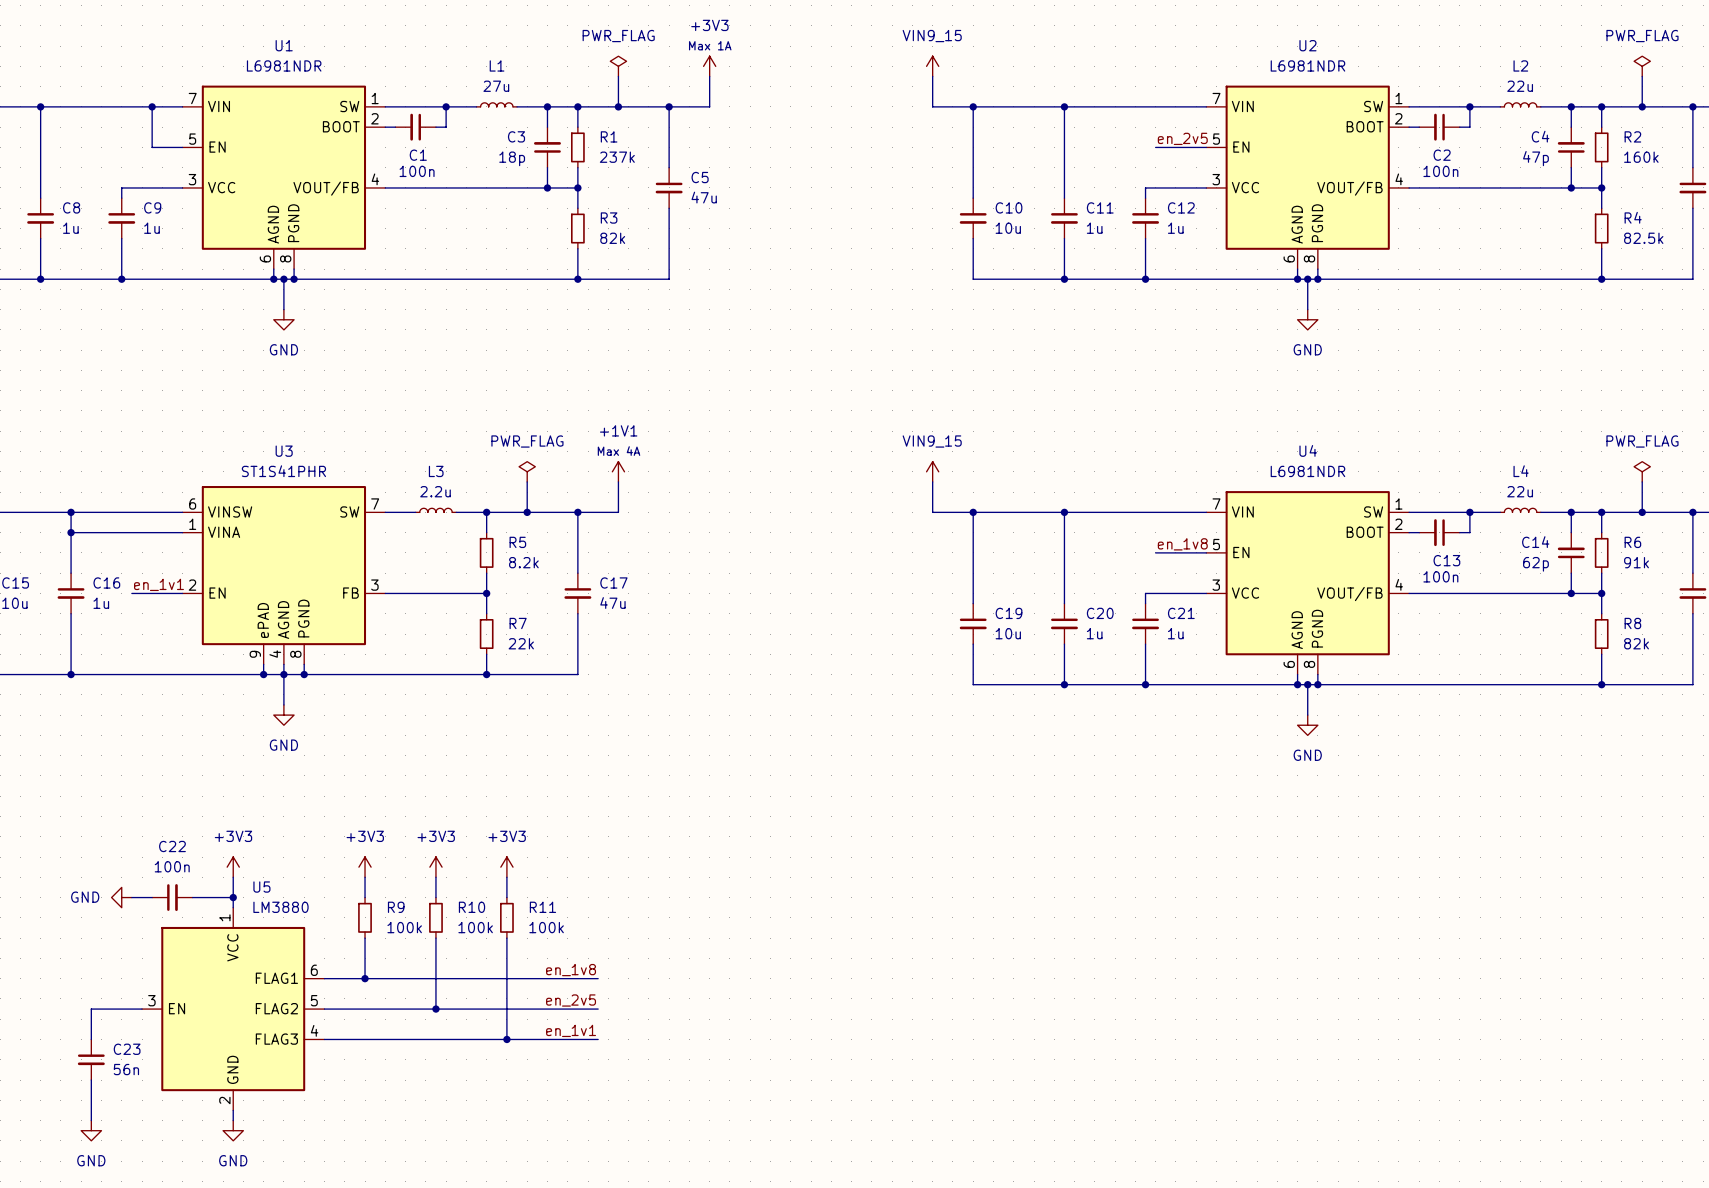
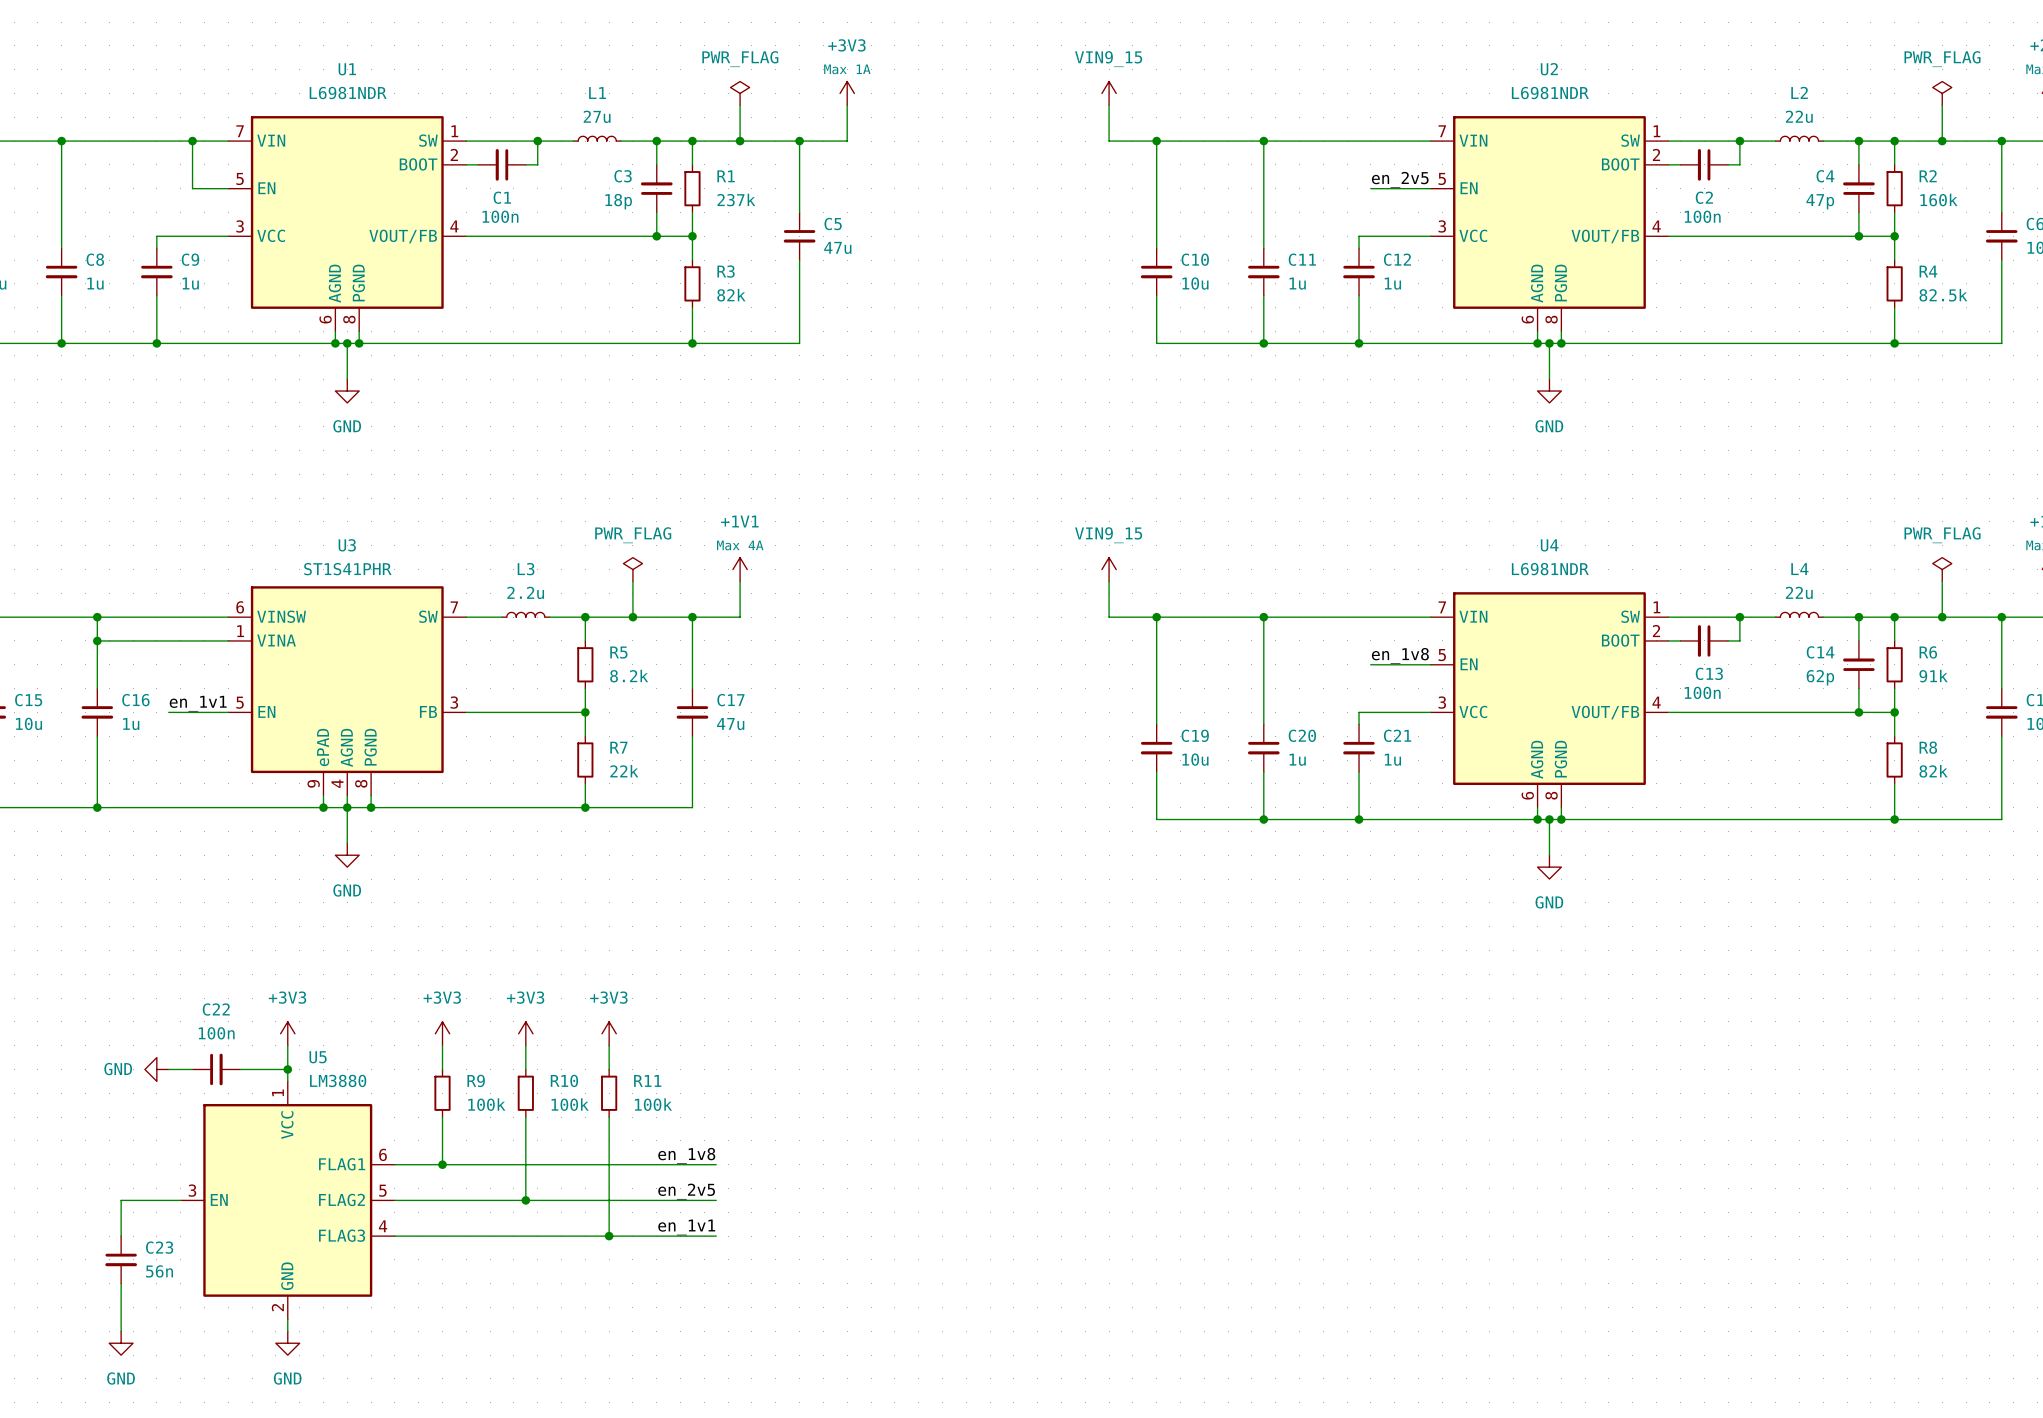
U3 pin number: 2 (192, 585) -> 5 (240, 702)

